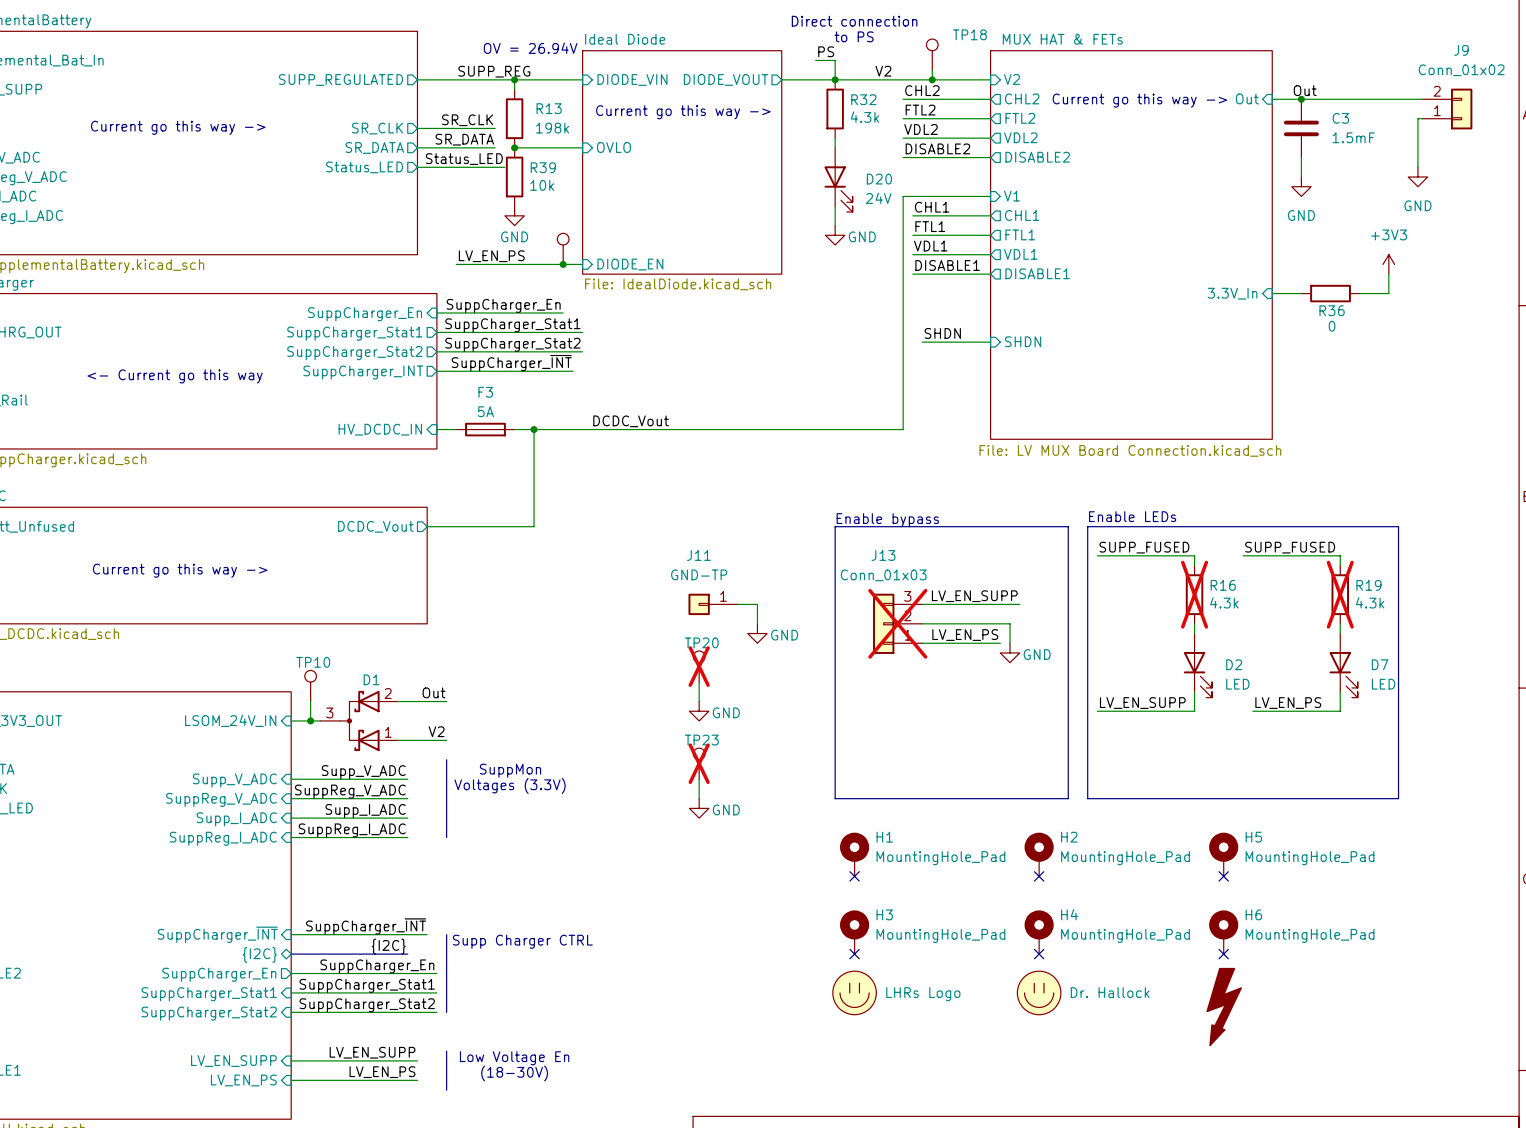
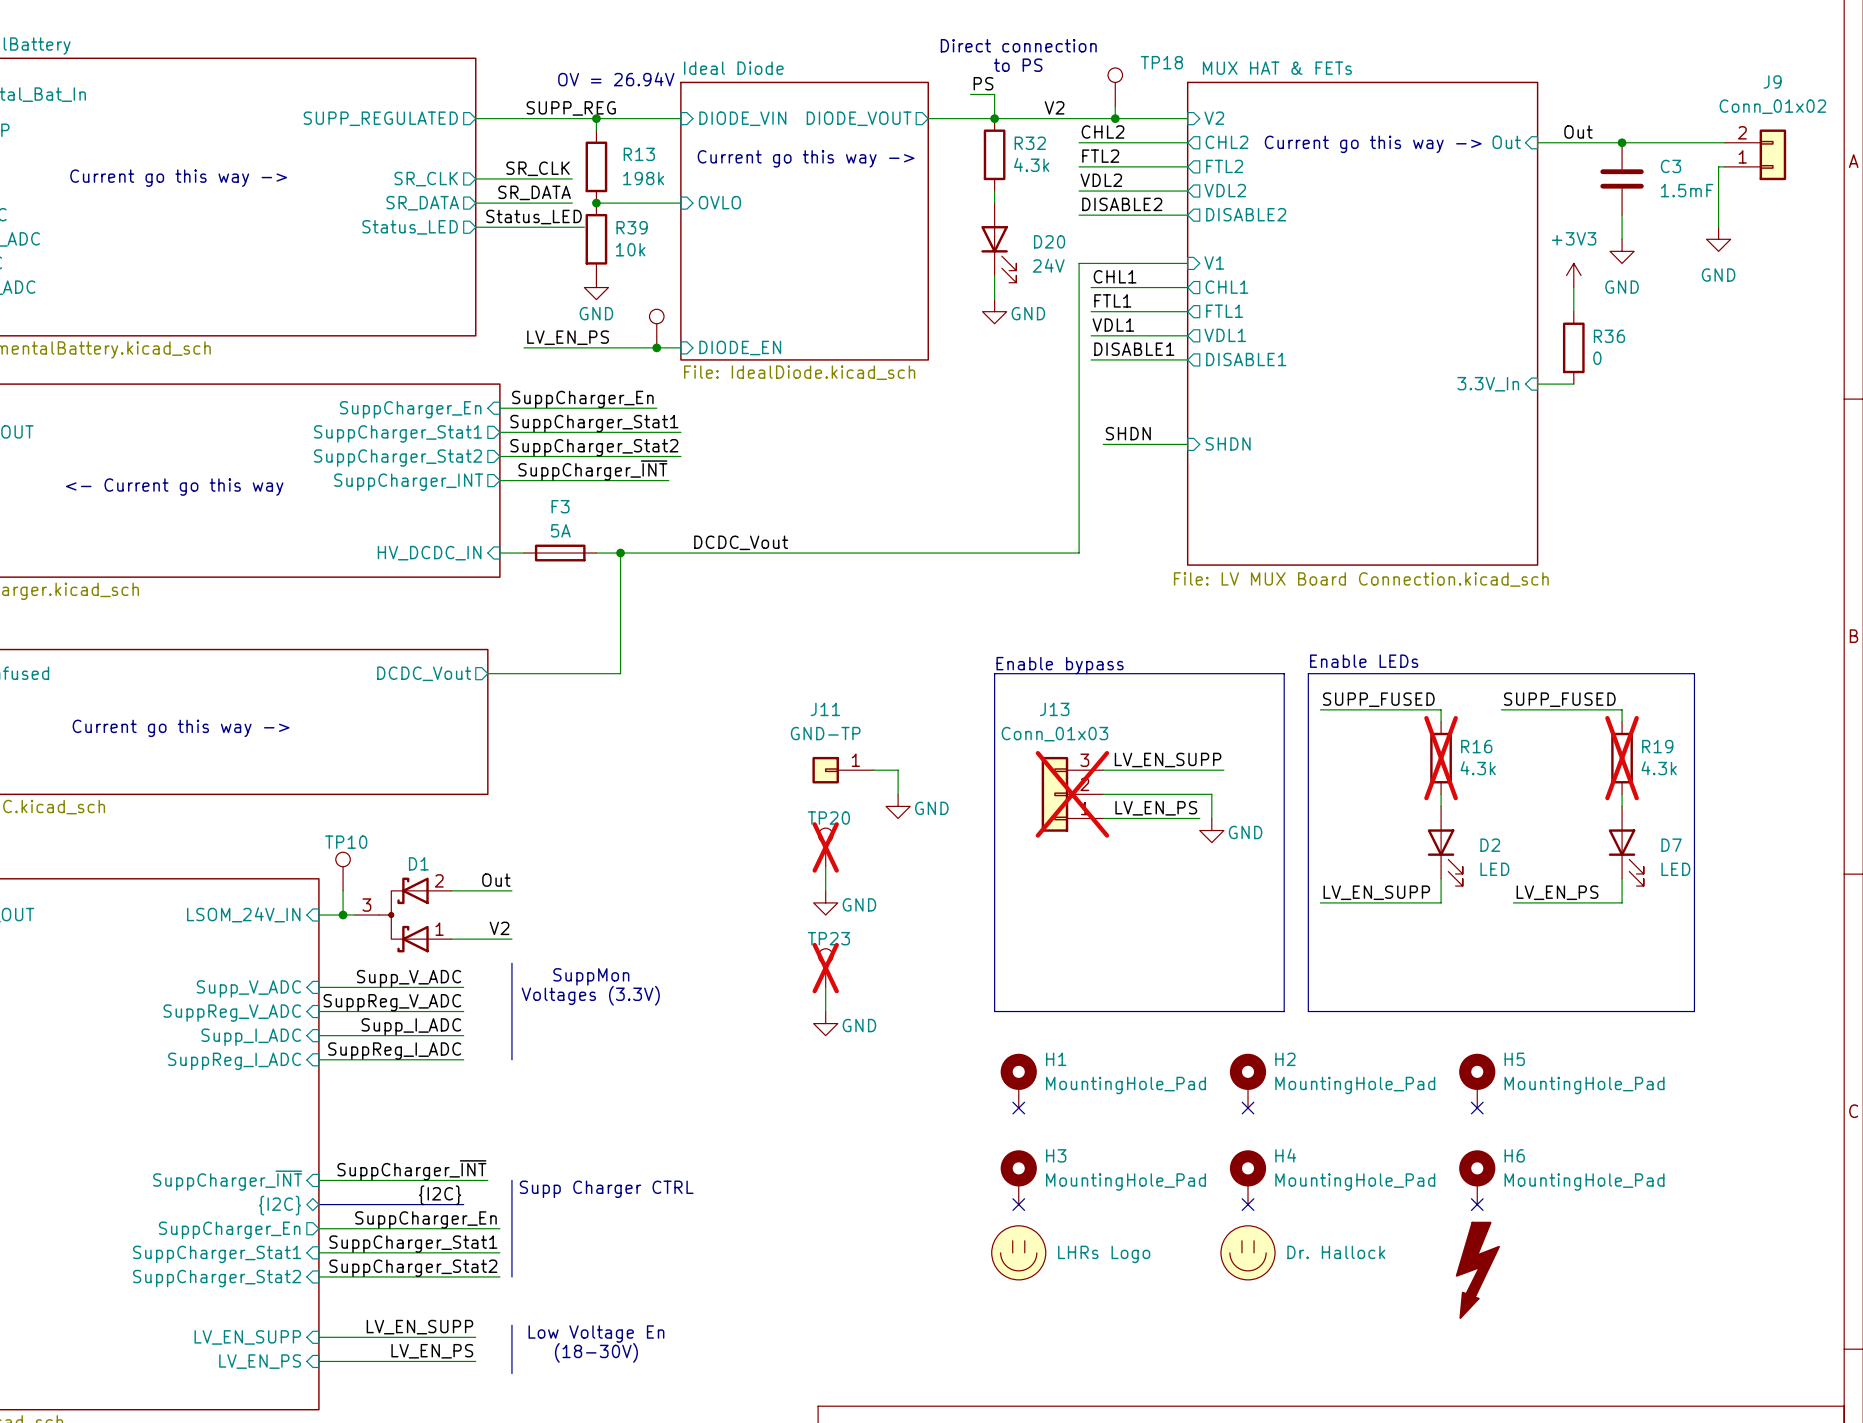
junction position: (1301, 99) -> (1622, 142)
C3 position: (1301, 128) -> (1622, 178)
wire: (1301, 157) (1301, 177) -> (1622, 215) (1622, 239)
power symbol position: GND (1301, 186) -> GND (1622, 251)
wire: none -> (1573, 287) (1573, 311)
power symbol position: +3V3 (1388, 264) -> +3V3 (1573, 275)
wire: (1388, 274) (1388, 293) (1359, 293) -> none
R36 rotation: 0° (1330, 293) -> 90° clockwise (1573, 347)
R36 position: (1330, 293) -> (1573, 347)
R36 name position: R36 (1332, 310) -> R36 (1609, 336)
R36 value position: 0 (1332, 326) -> 0 (1597, 358)

